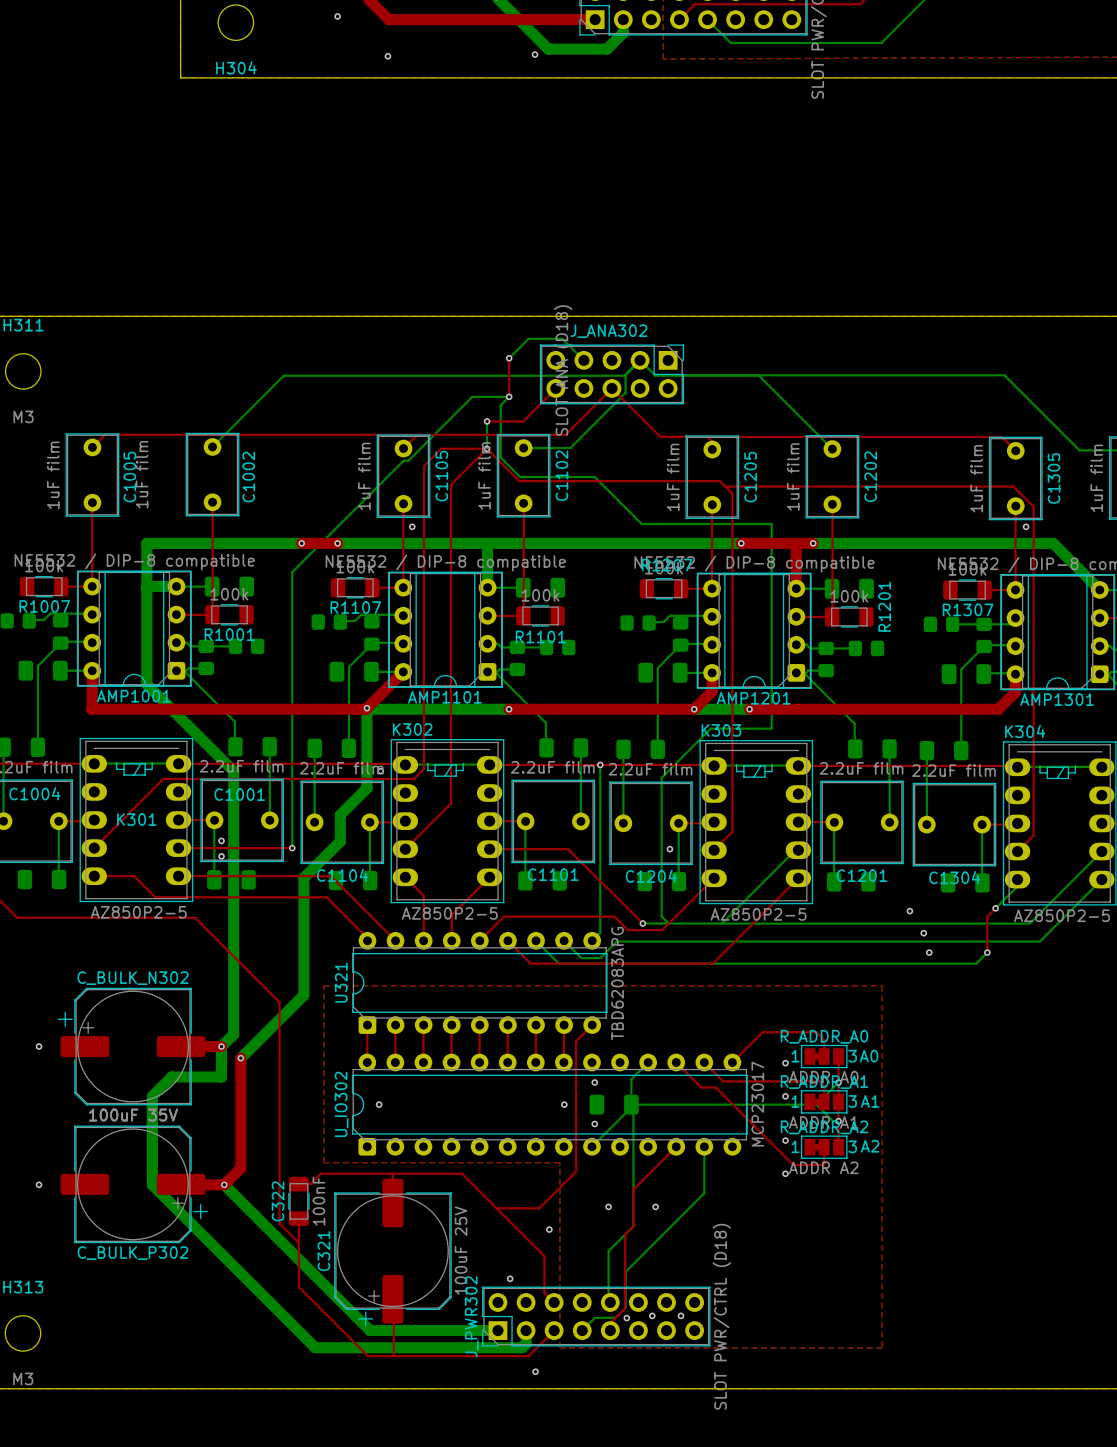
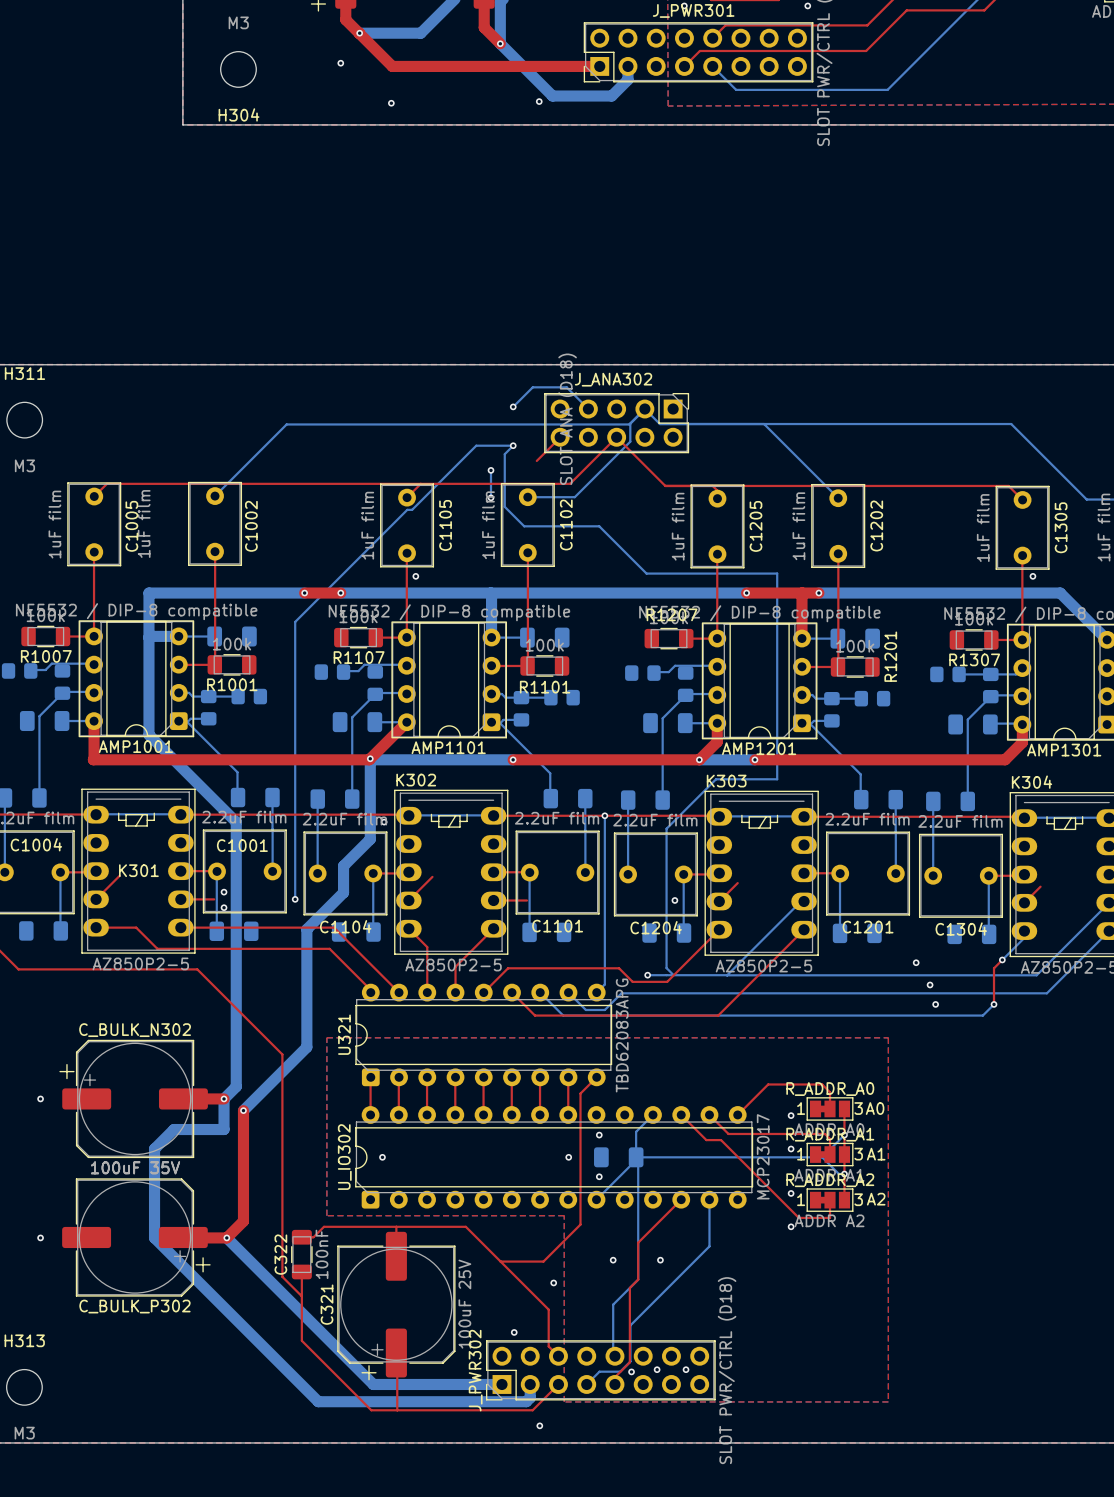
top track: (509, 358) (509, 396) -> none
top track: (532, 412) (523, 421) (487, 421) -> none
top track: (487, 448) (441, 448) (423, 466) (423, 769) (413, 778) (163, 778) (117, 824) -> none
top track: (487, 448) (519, 481) (719, 481) (732, 493) (732, 831) -> none
top track: (487, 448) (450, 484) (450, 803) (428, 825) -> none
top track: (725, 486) (1013, 486) (1033, 506) (1033, 835) -> none
top track: (211, 848) (292, 848) -> none
top track: (522, 849) (568, 849) (642, 923) -> none

